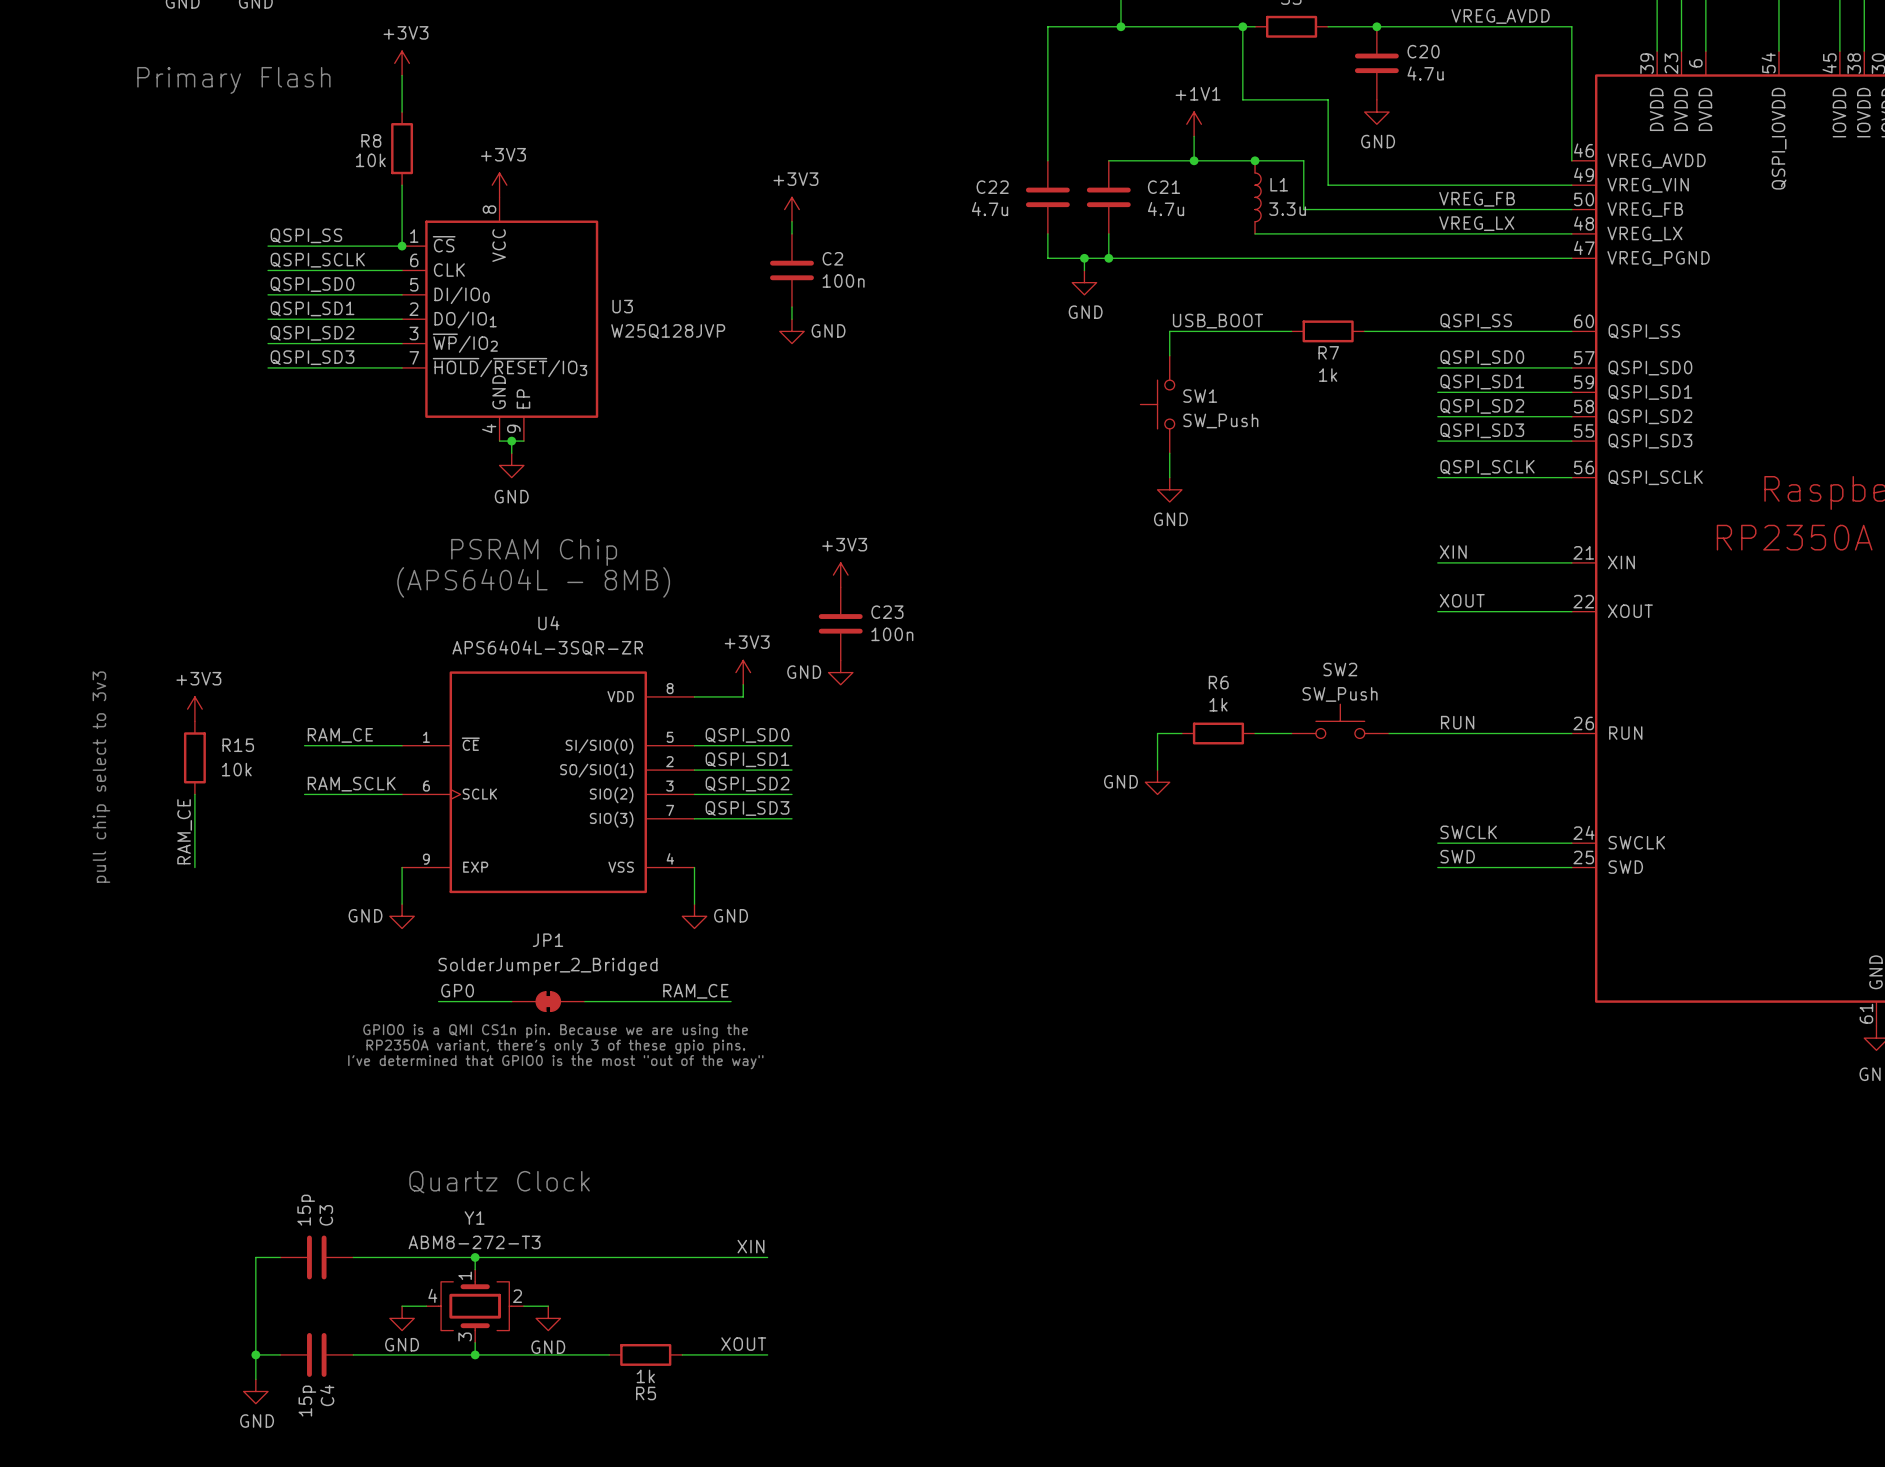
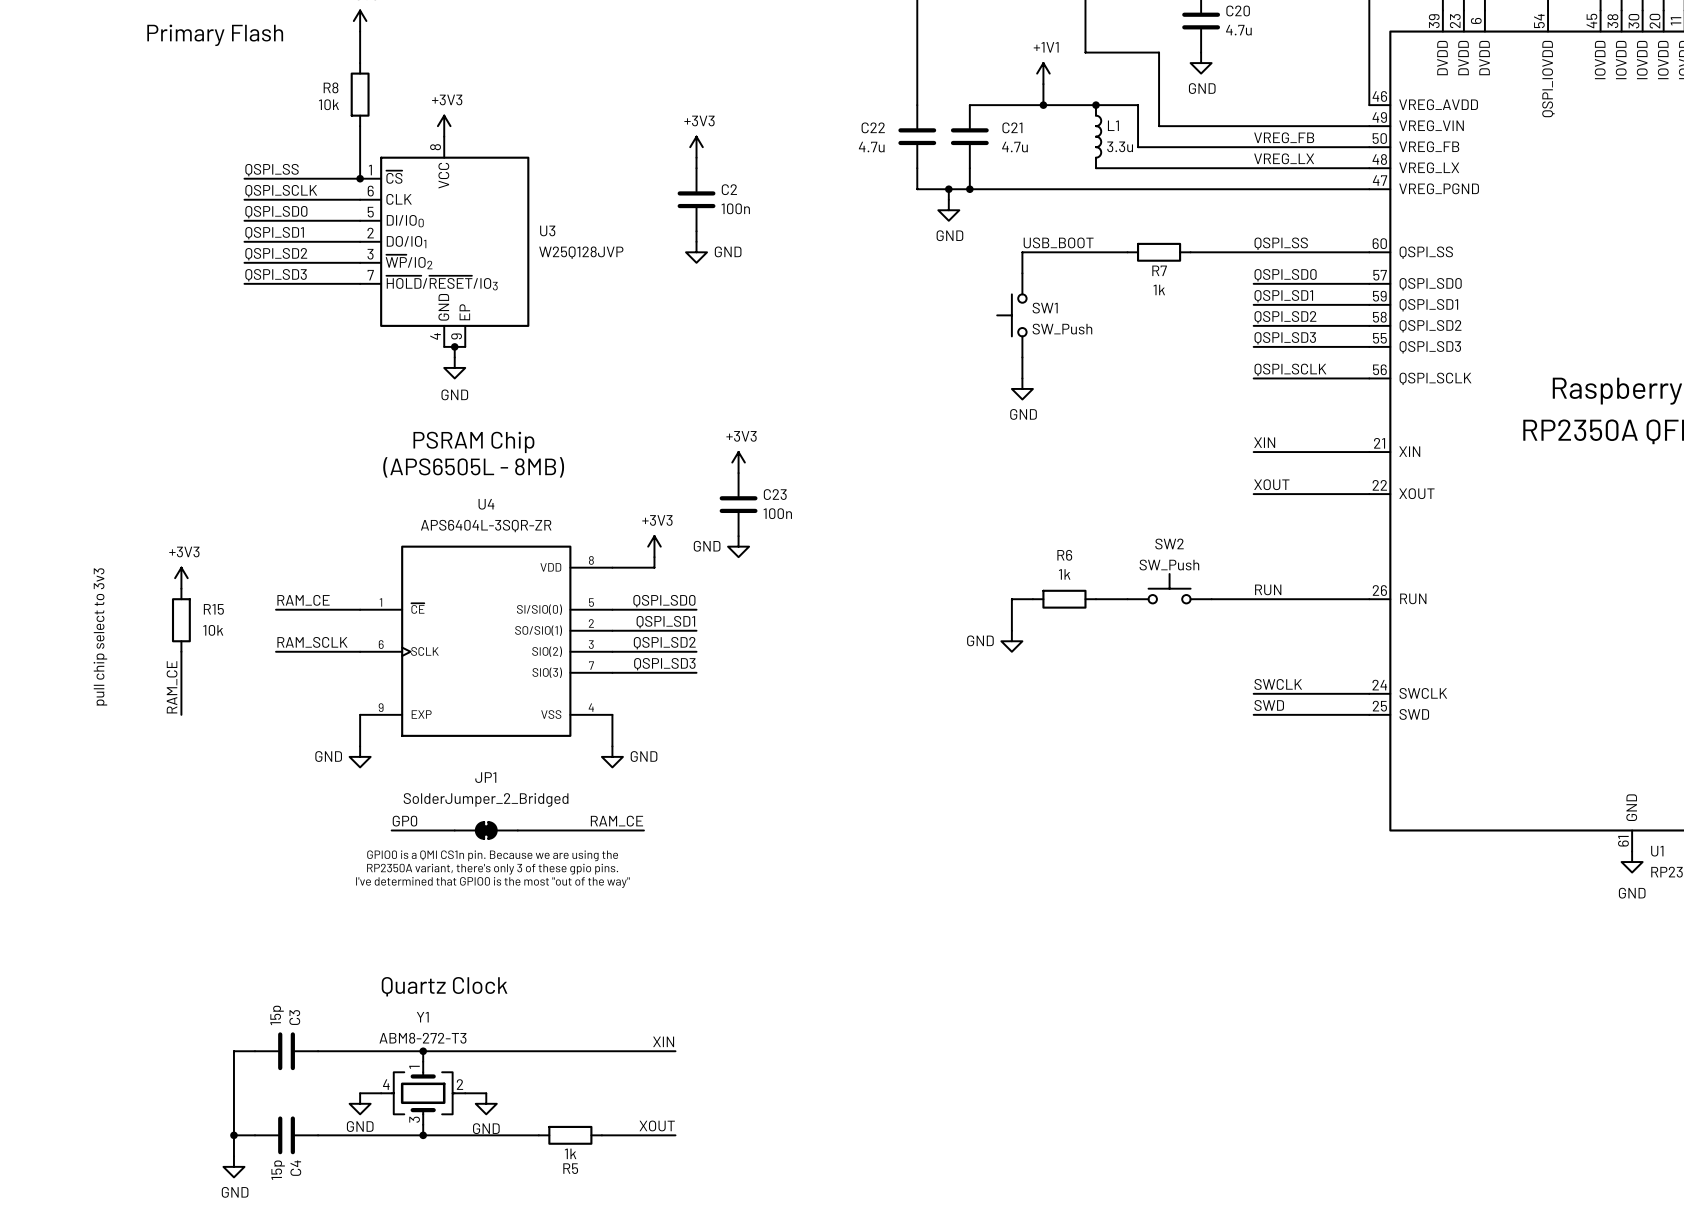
text: (APS6404L - 8MB) (533, 582) -> (APS6505L - 8MB) (473, 467)

